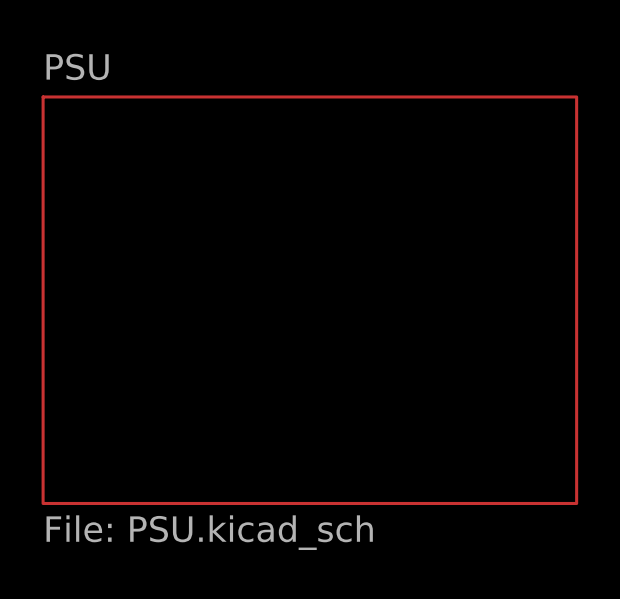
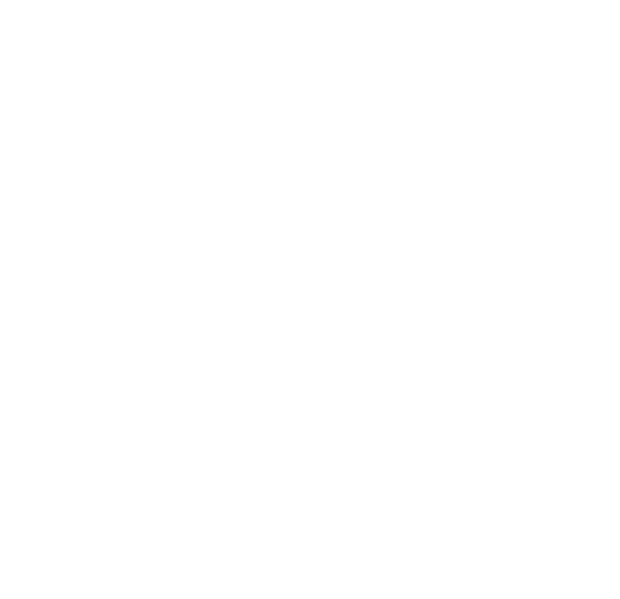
sheet PSU: File: PSU.kicad_sch (309, 300) -> none

